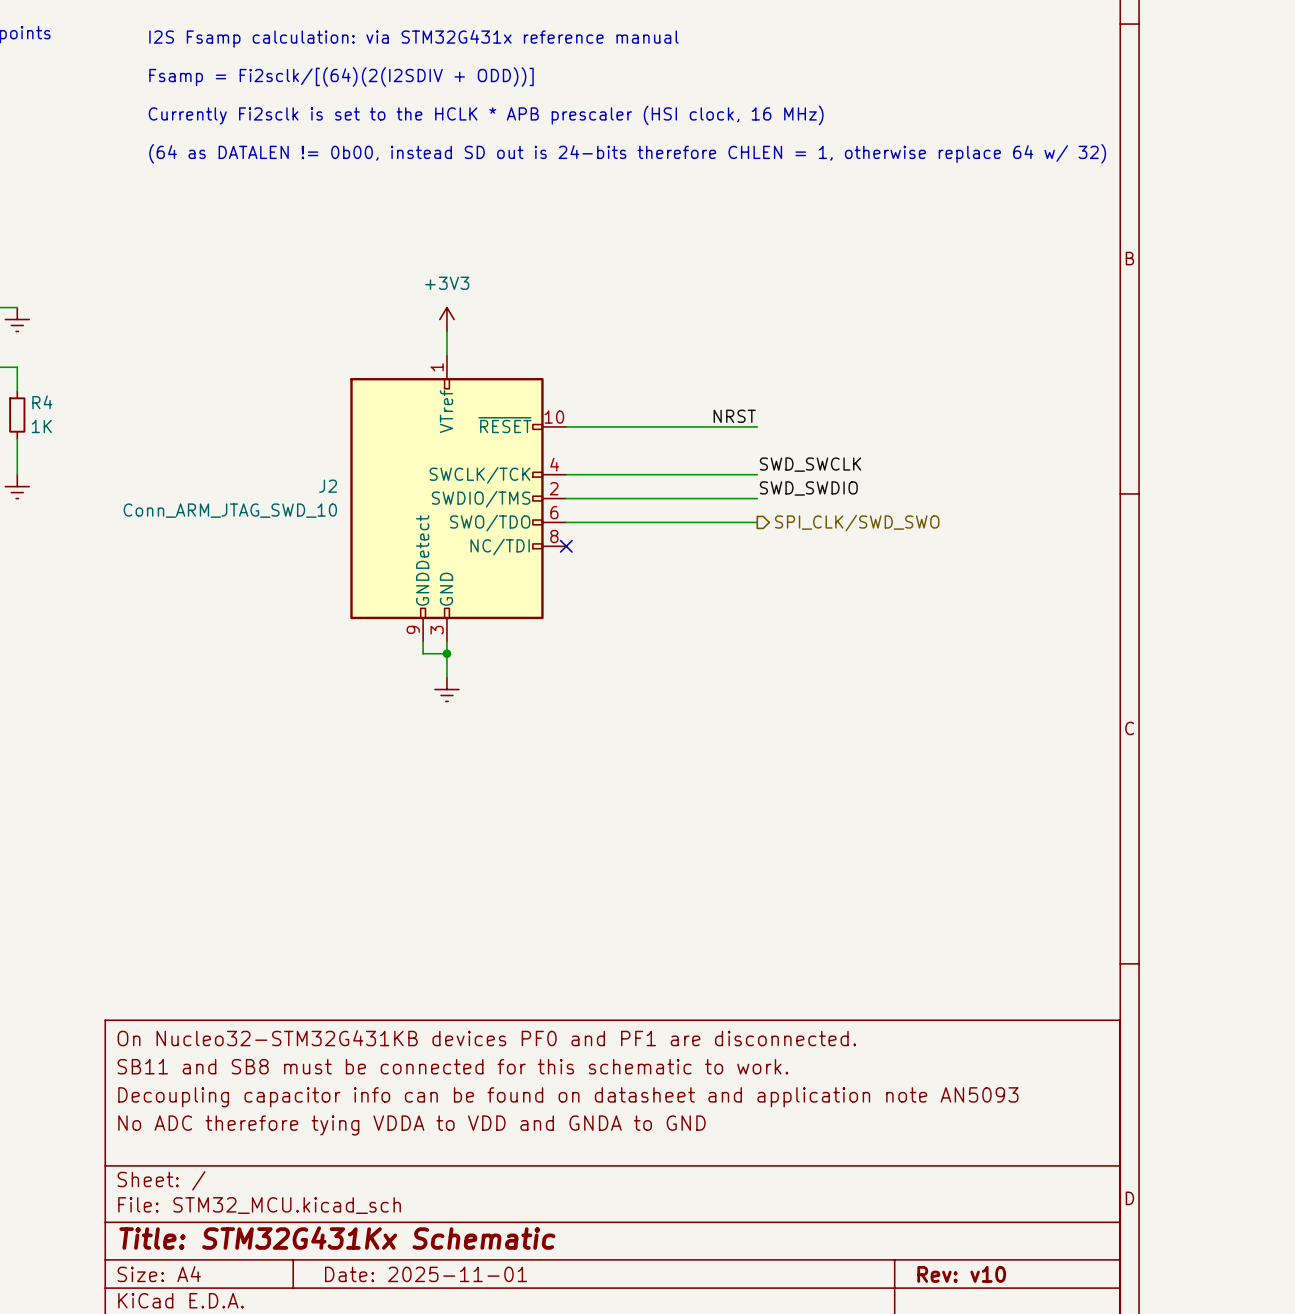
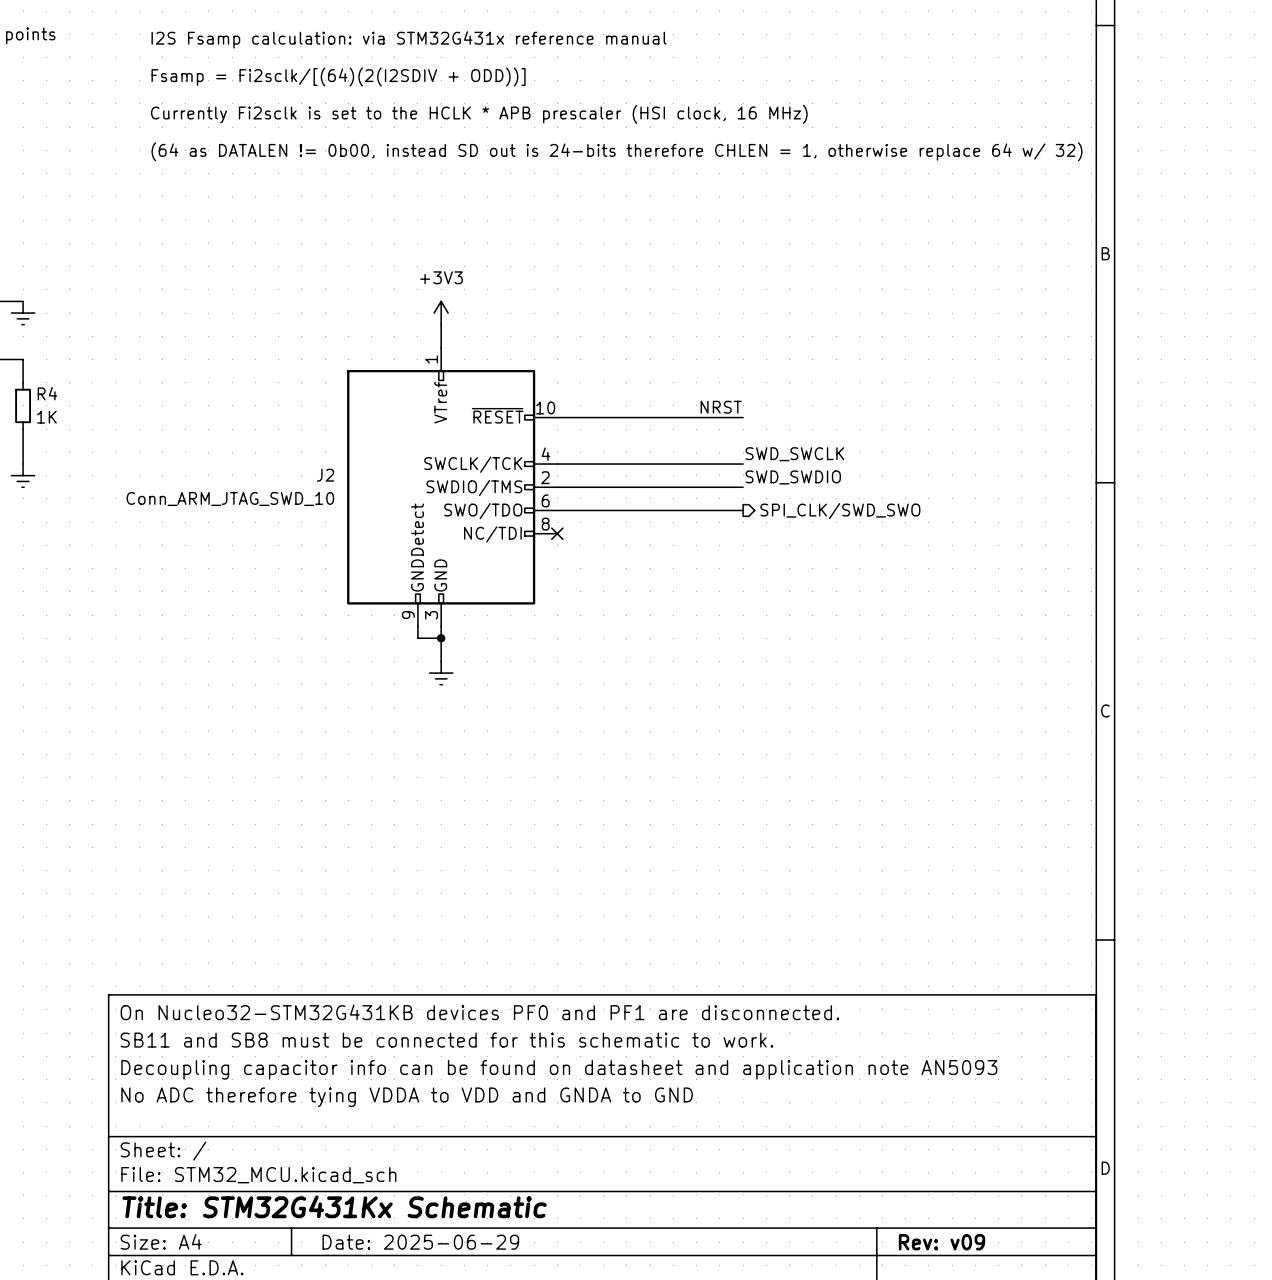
title block: Date: 2025-11-01 (426, 1274) -> Date: 2025-06-29 (420, 1242)
title block: Rev: v10 (961, 1274) -> Rev: v09 (941, 1242)

